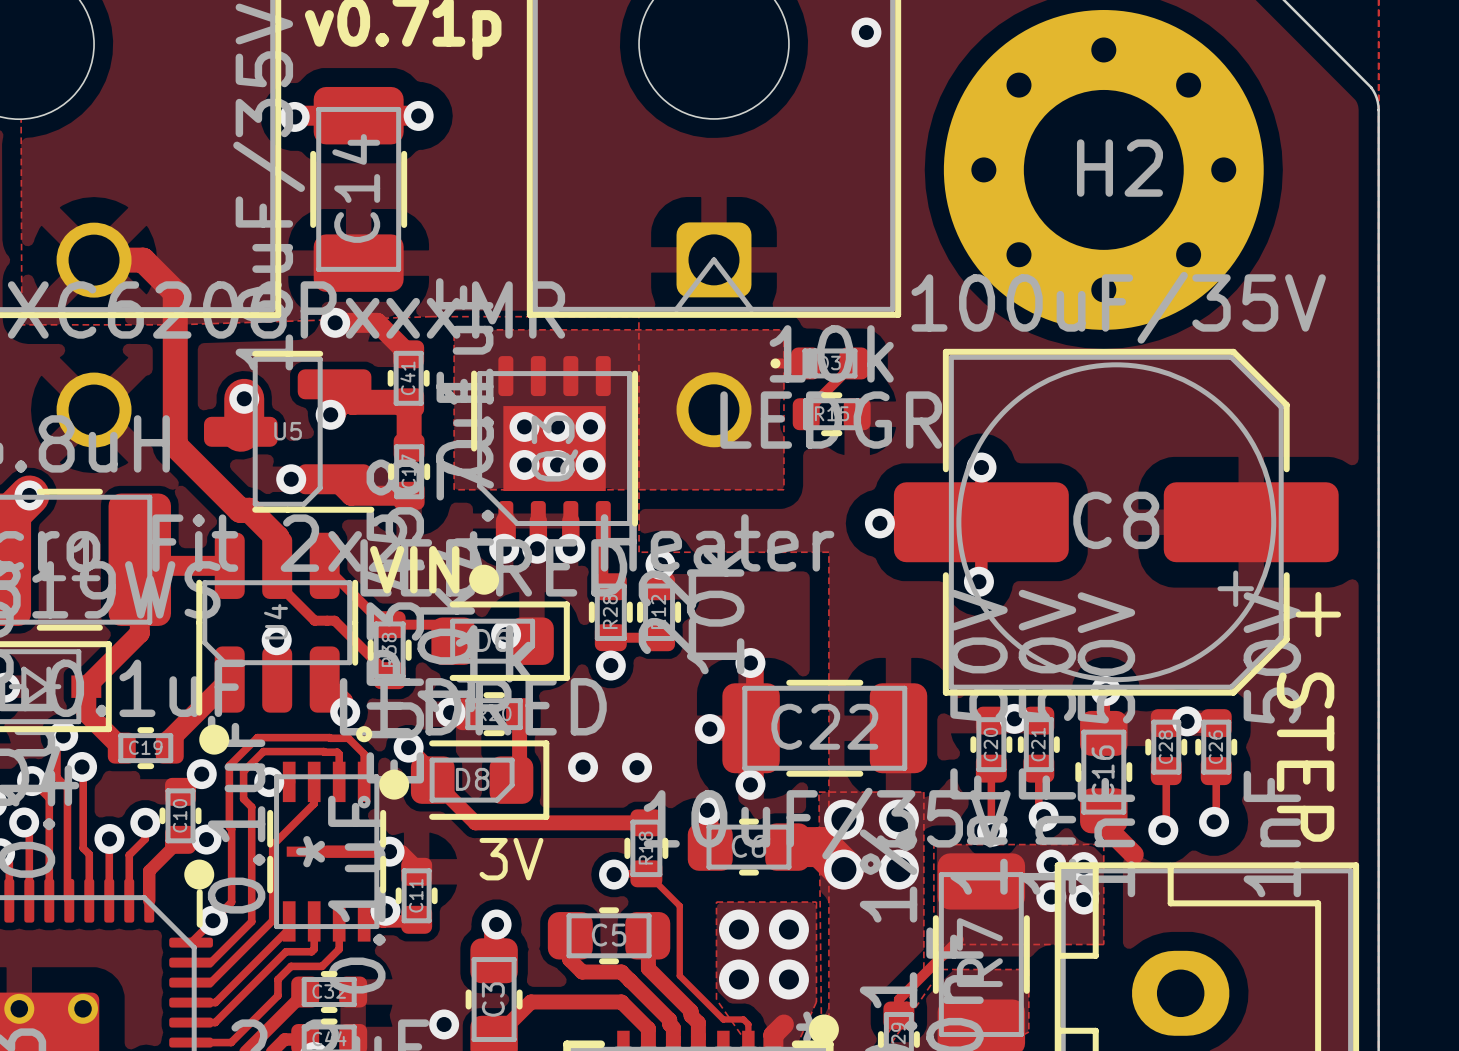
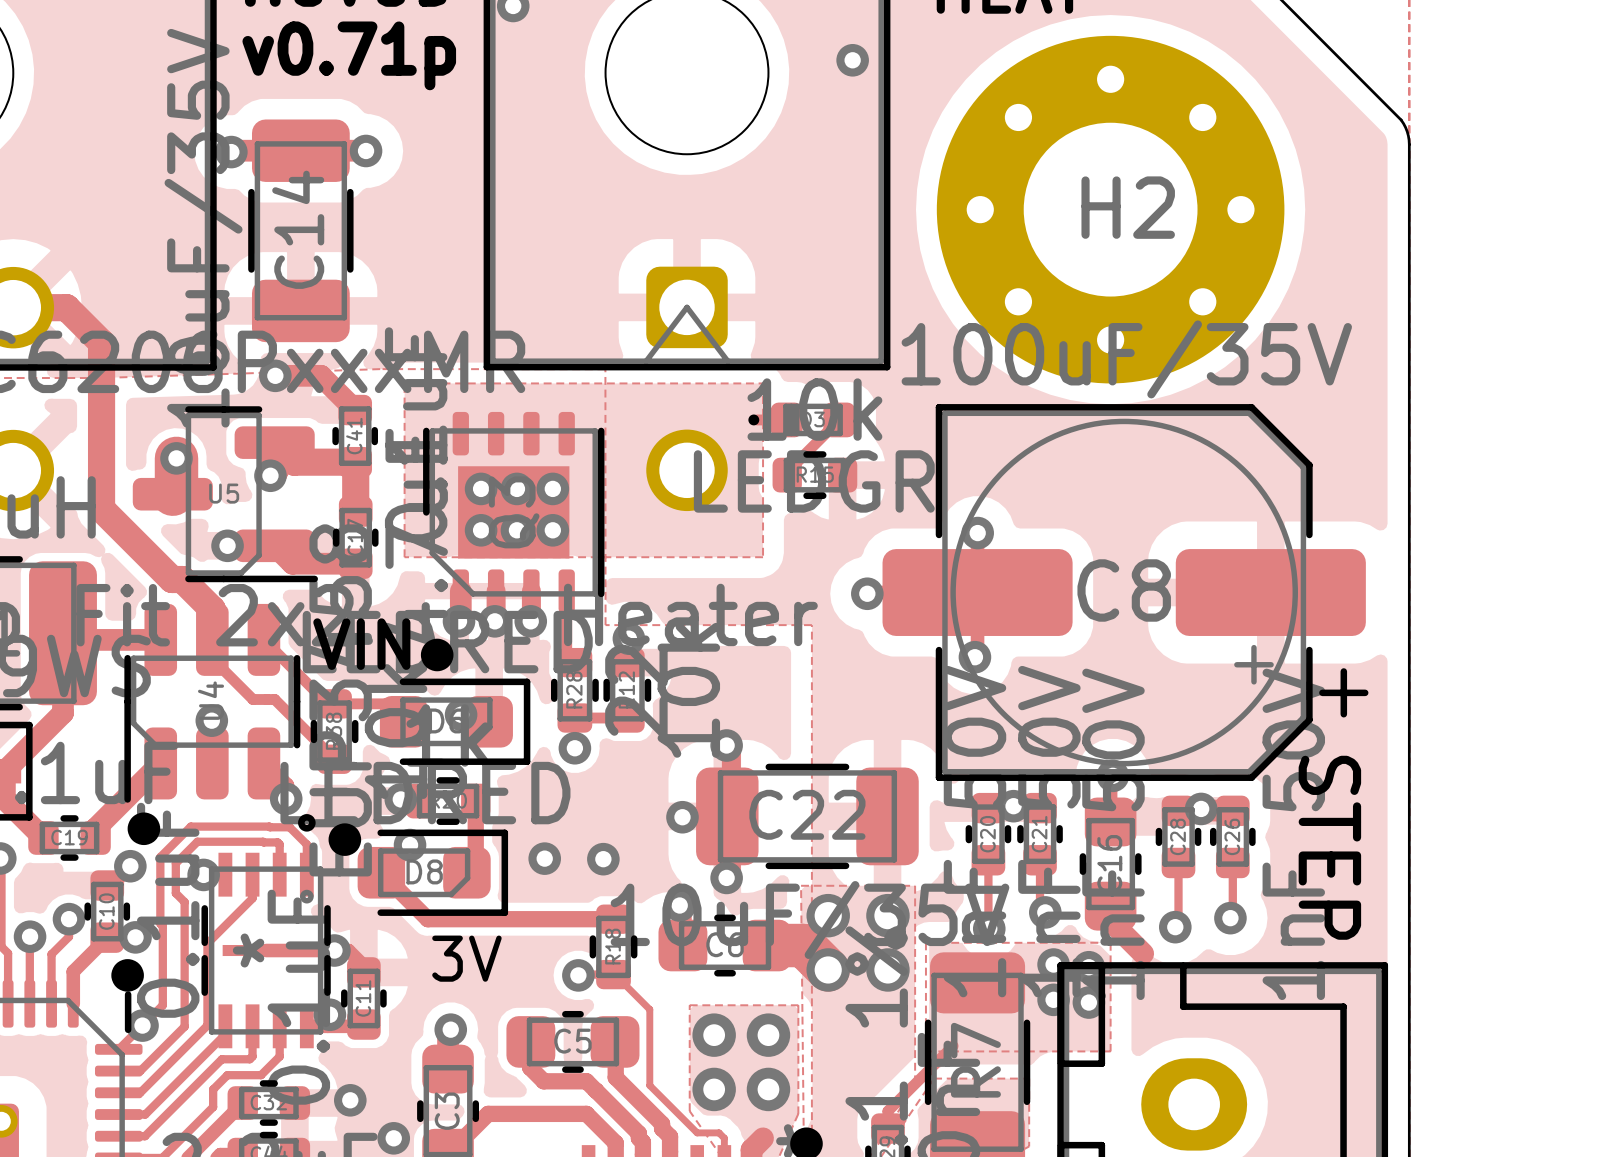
via position: (408, 747) -> (410, 845)
drawing position: (394, 784) -> (344, 839)
via: none -> (350, 1100)

